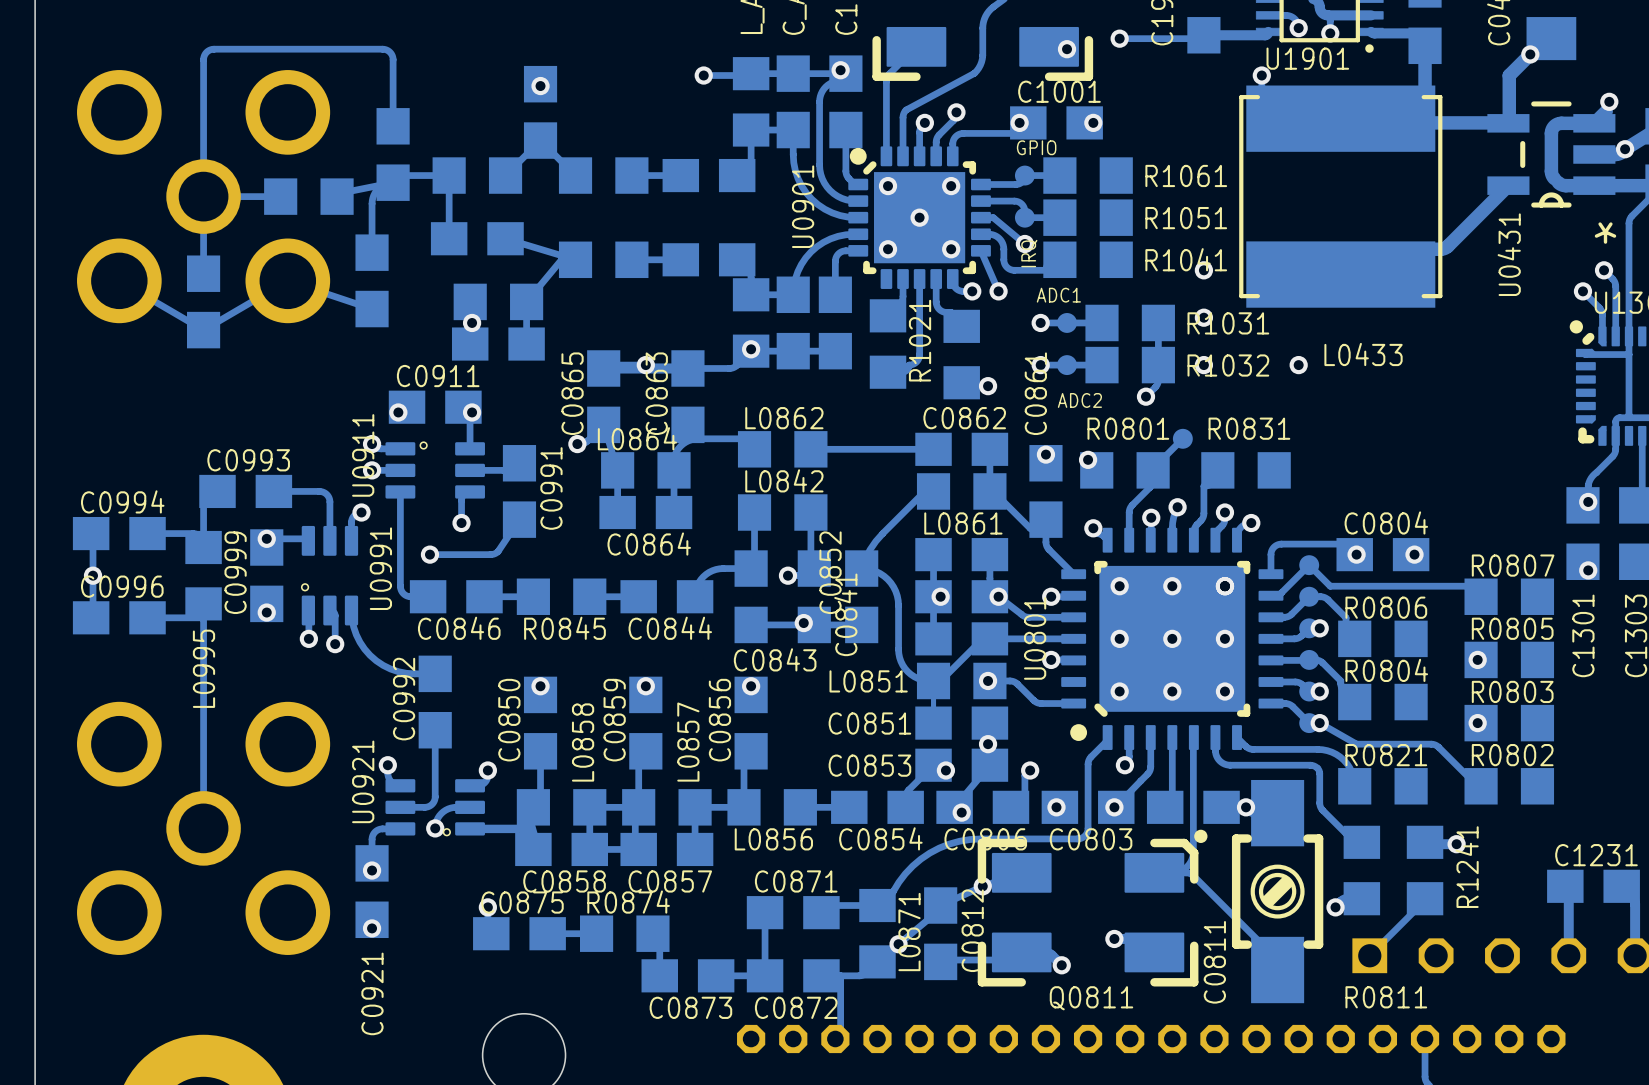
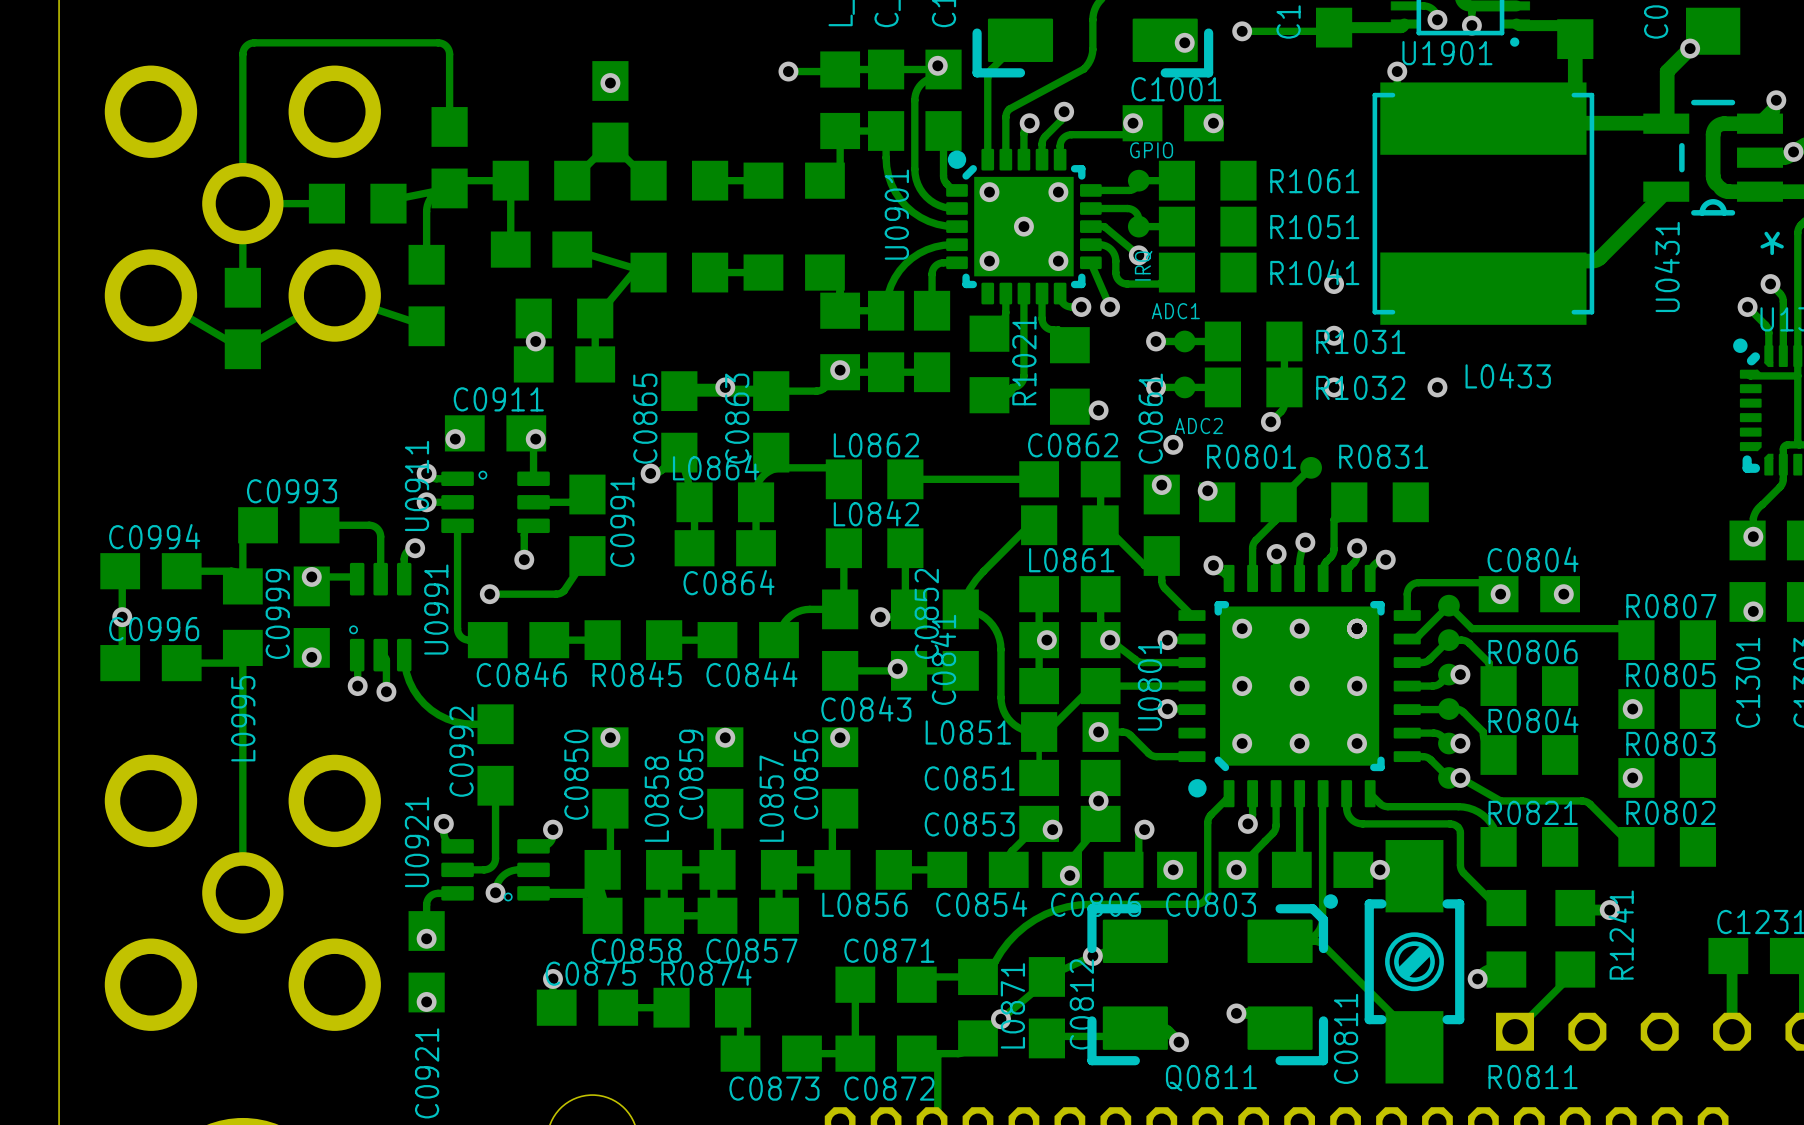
via: none -> (1173, 444)

